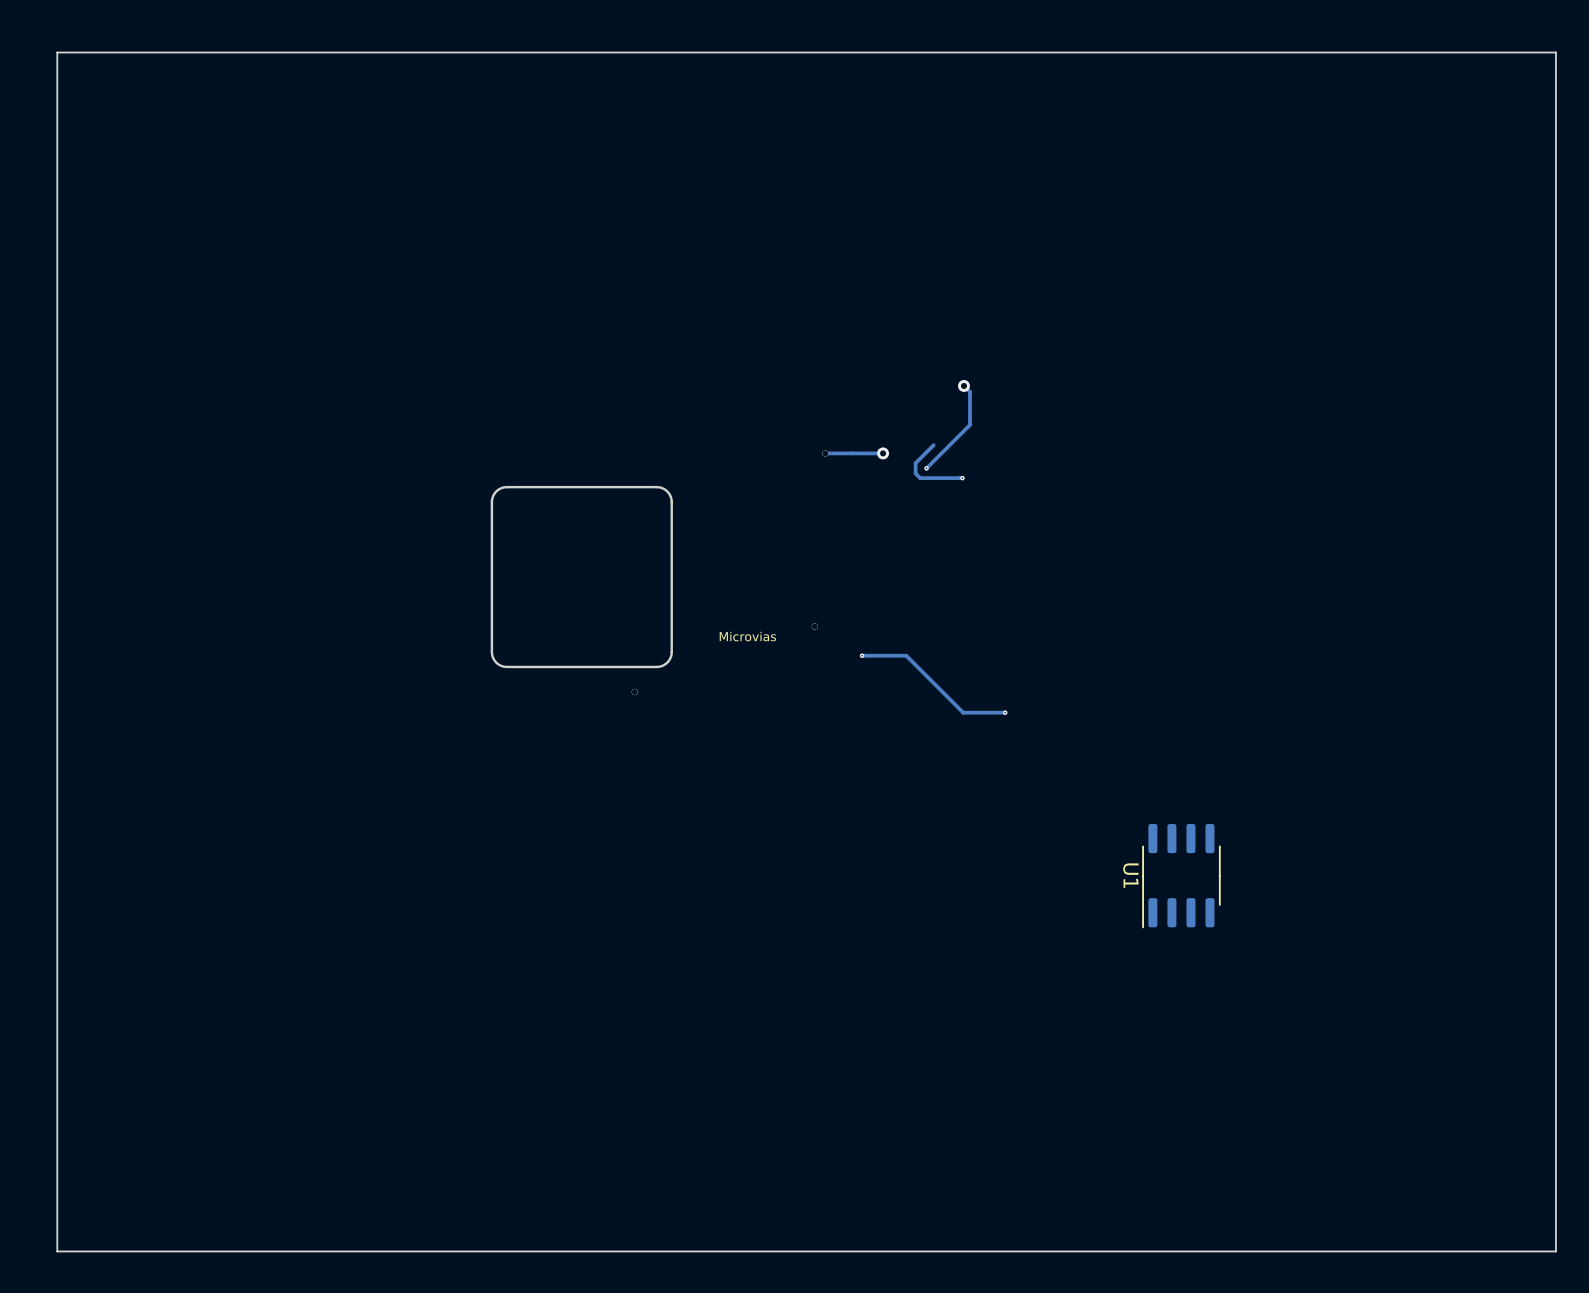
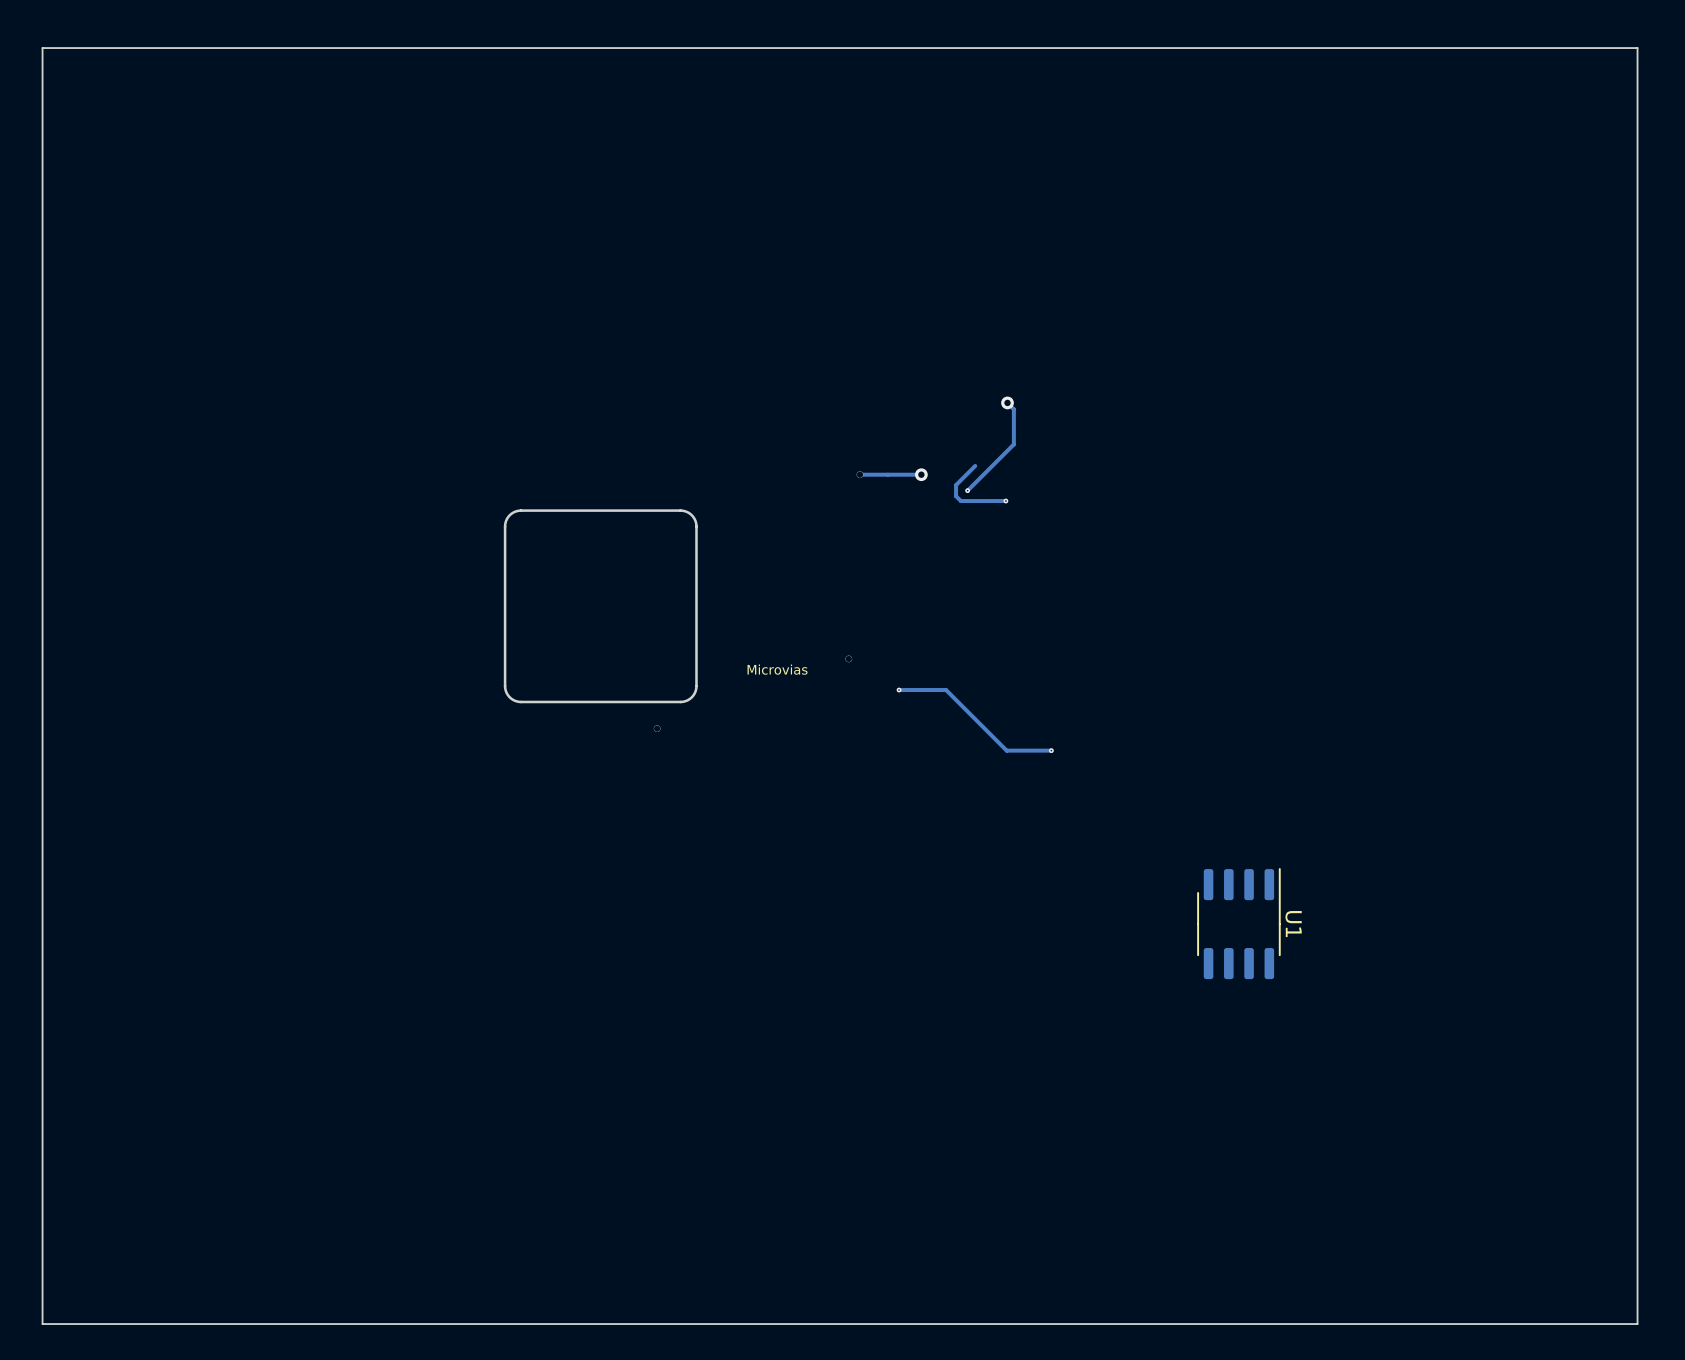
U1 rotation: 0° (1181, 876) -> 180° (1238, 923)

